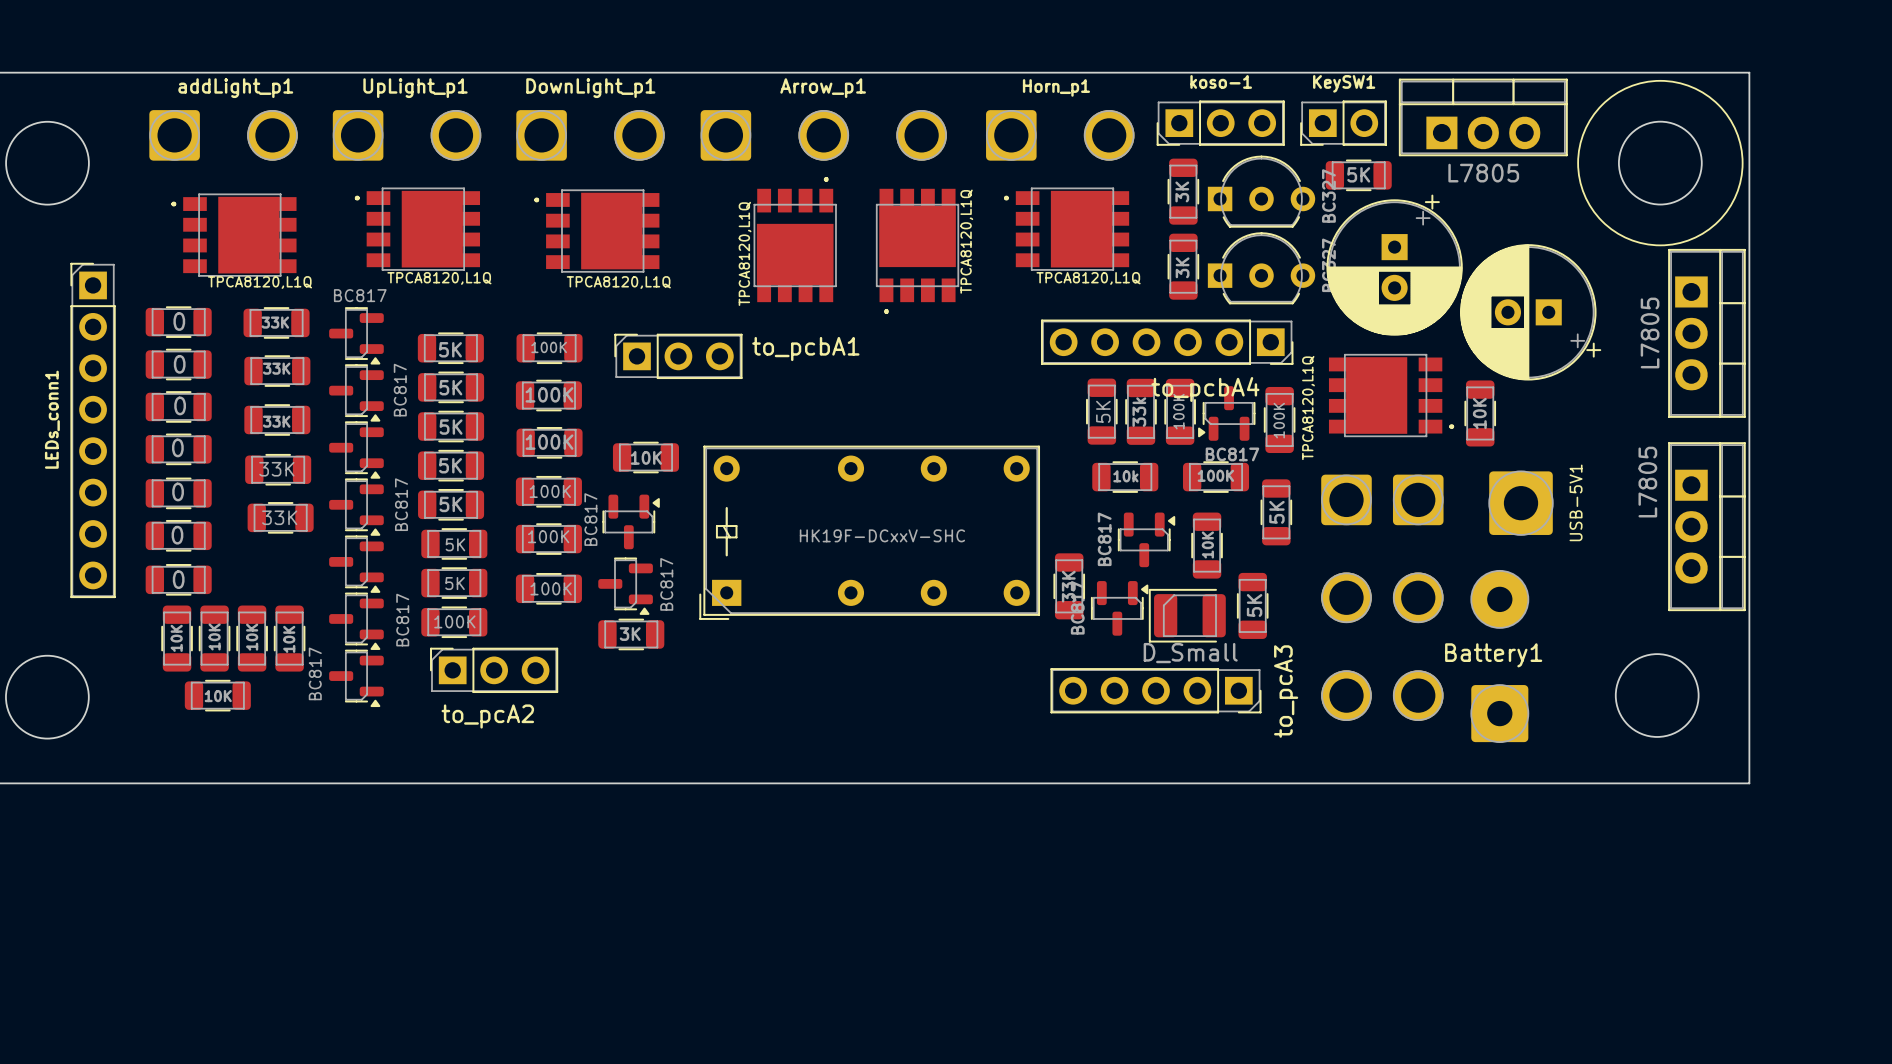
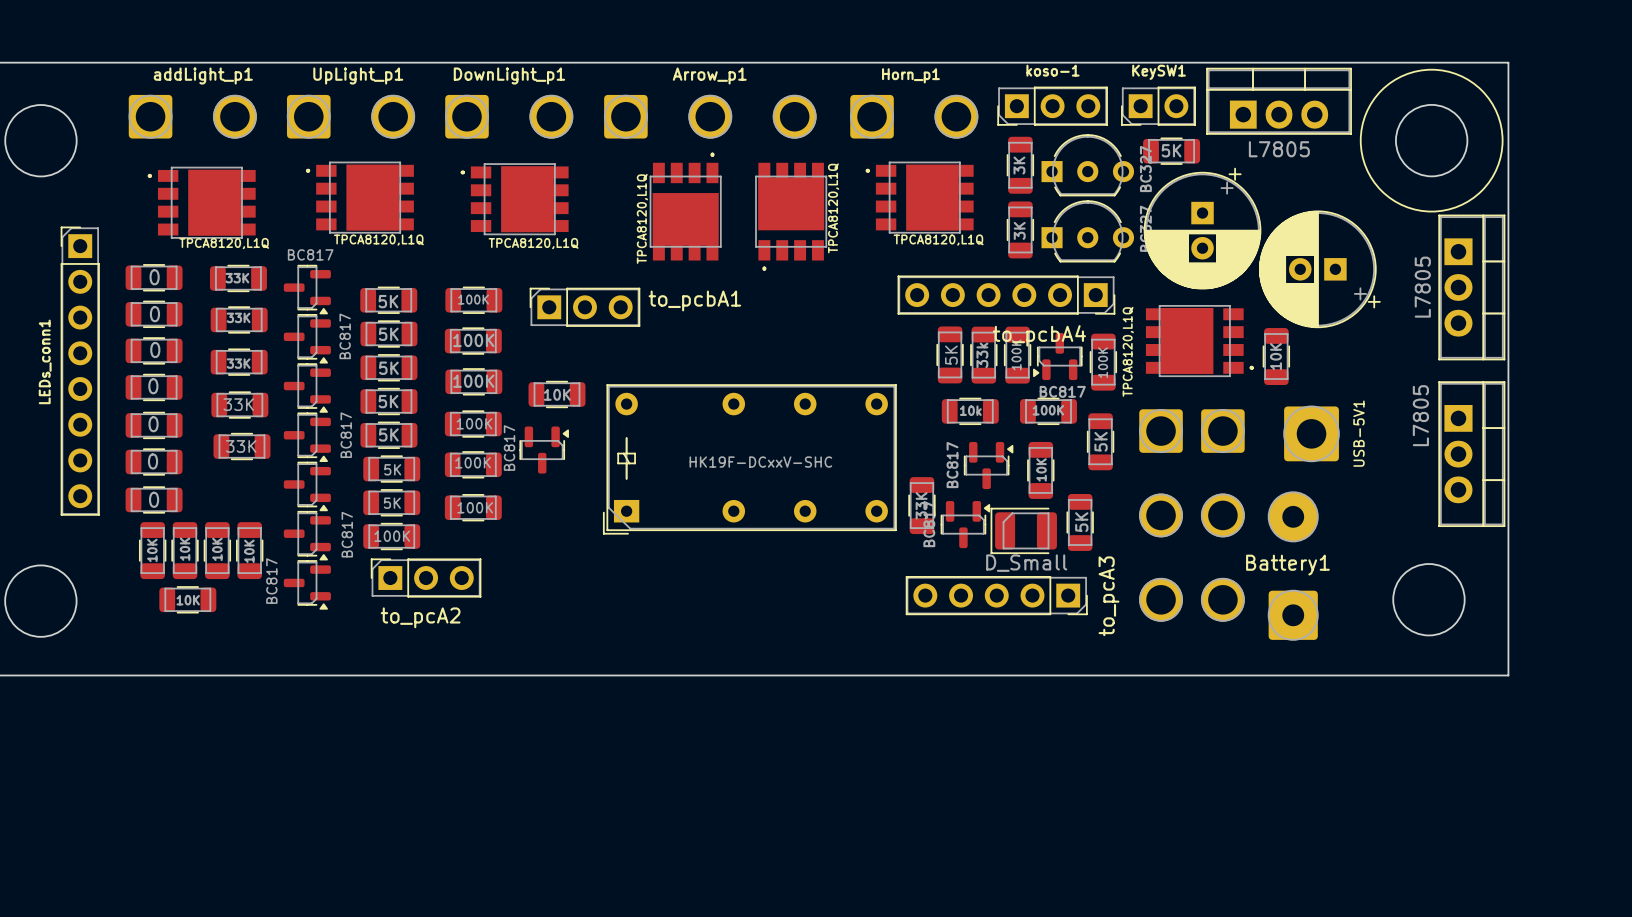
part: BC817 (625, 586) -> none
part: 3K (631, 634) -> none

